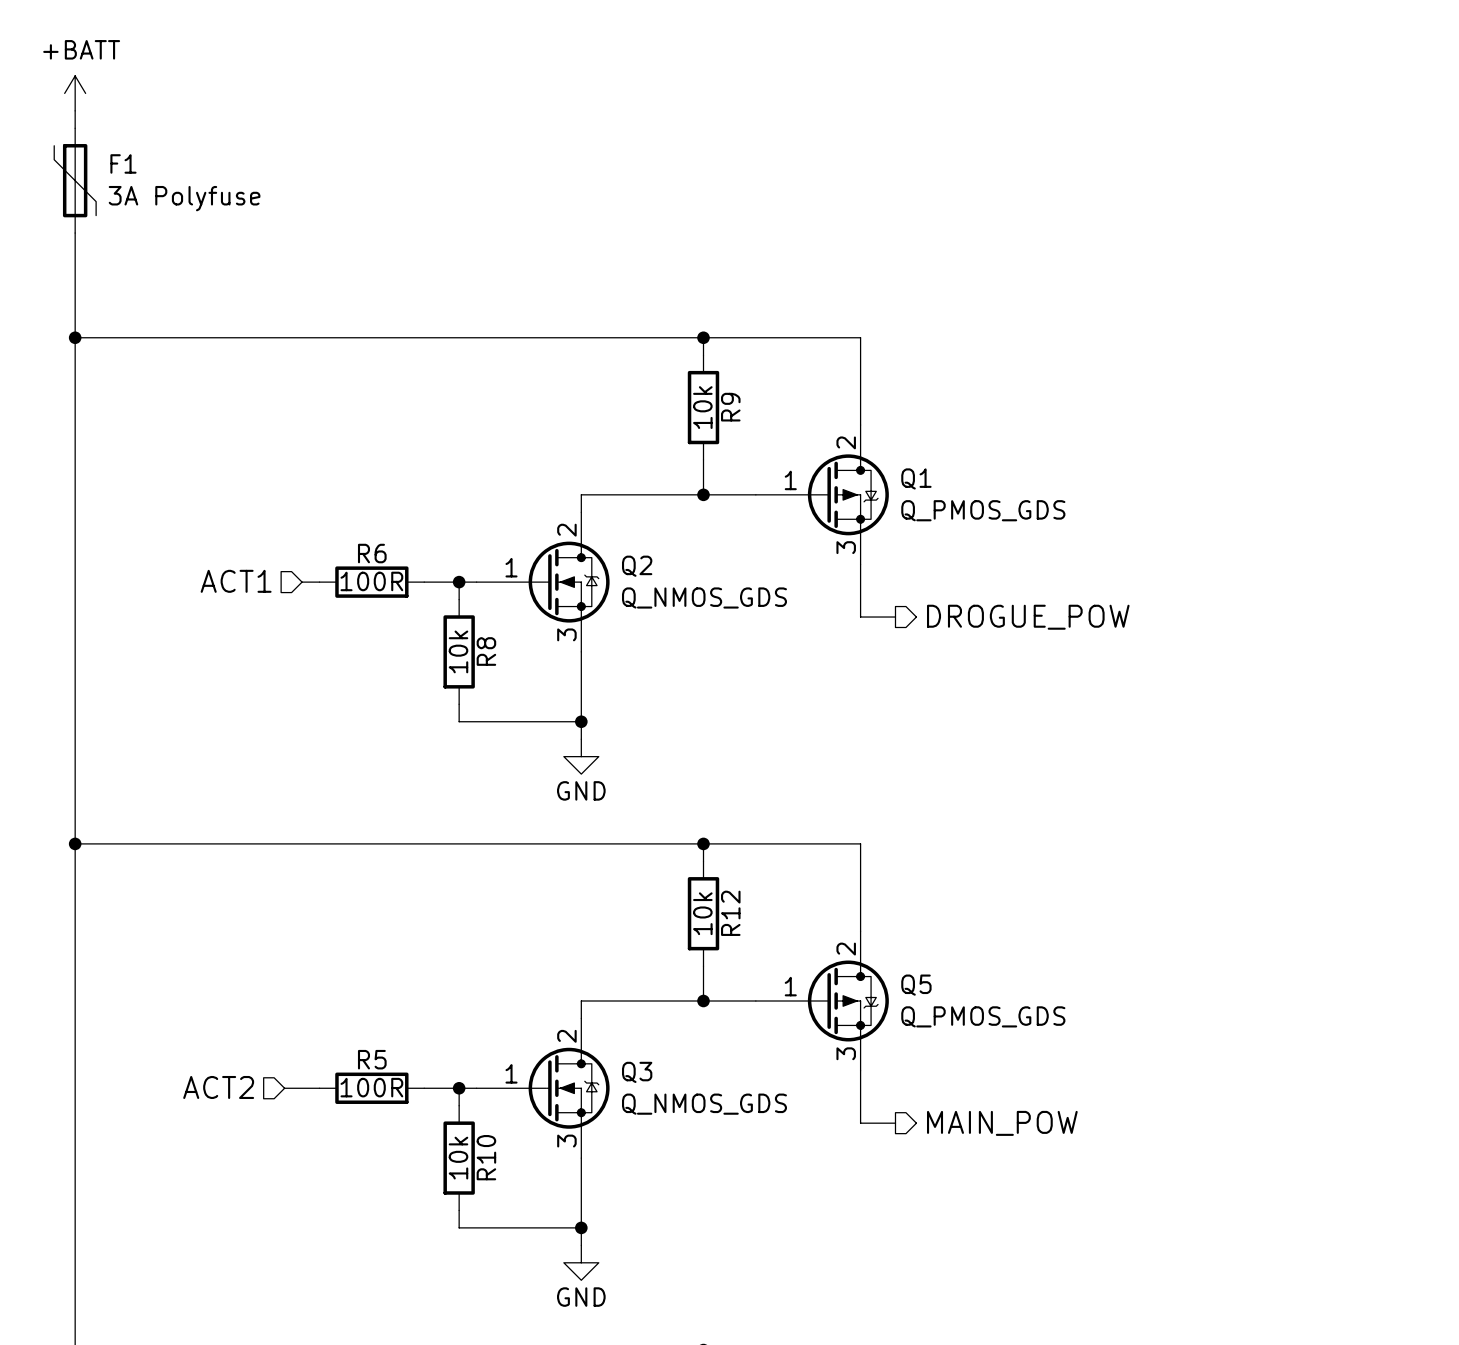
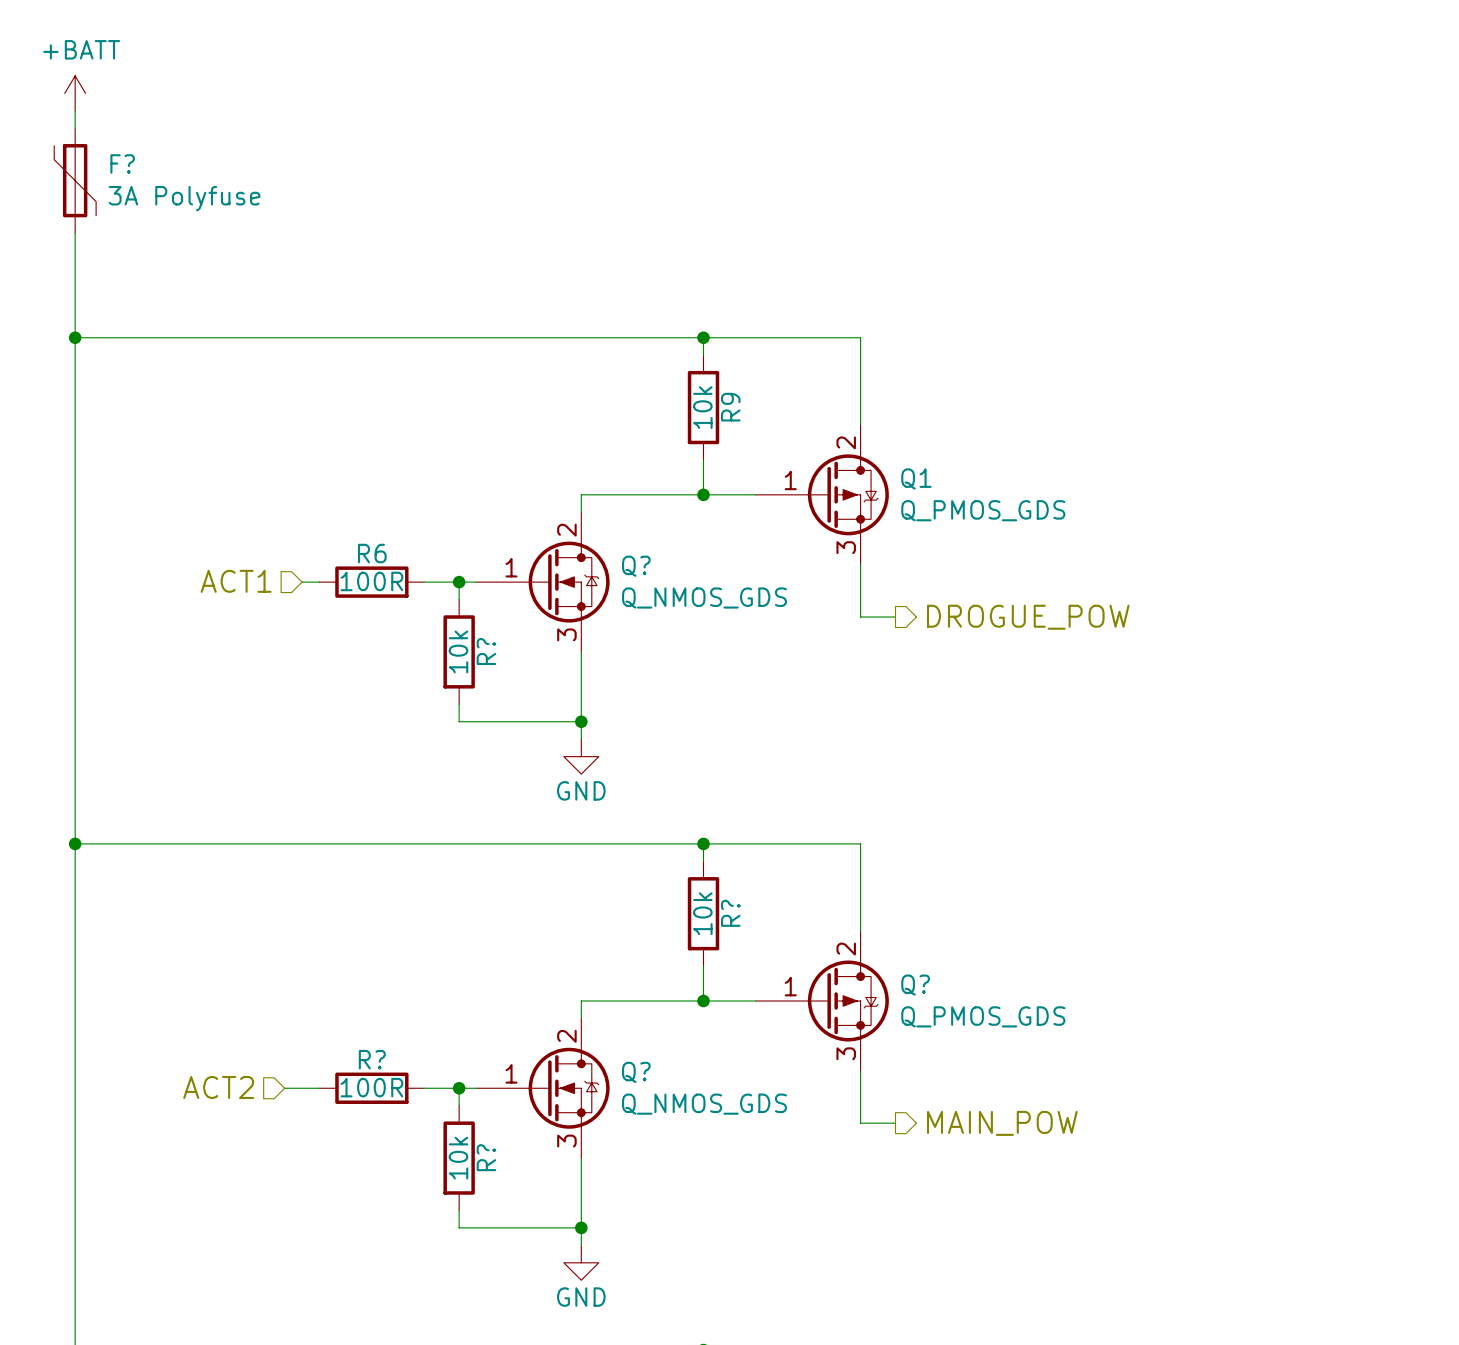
F1 name: F1 (123, 163) -> F? (122, 163)
Q2 name: Q2 (637, 566) -> Q? (636, 566)
R8 name: R8 (486, 651) -> R? (486, 651)
R12 name: R12 (730, 913) -> R? (730, 913)
Q5 name: Q5 (916, 985) -> Q? (915, 985)
R5 name: R5 (372, 1059) -> R? (372, 1059)
Q3 name: Q3 (637, 1072) -> Q? (636, 1072)
R10 name: R10 (486, 1157) -> R? (486, 1157)

